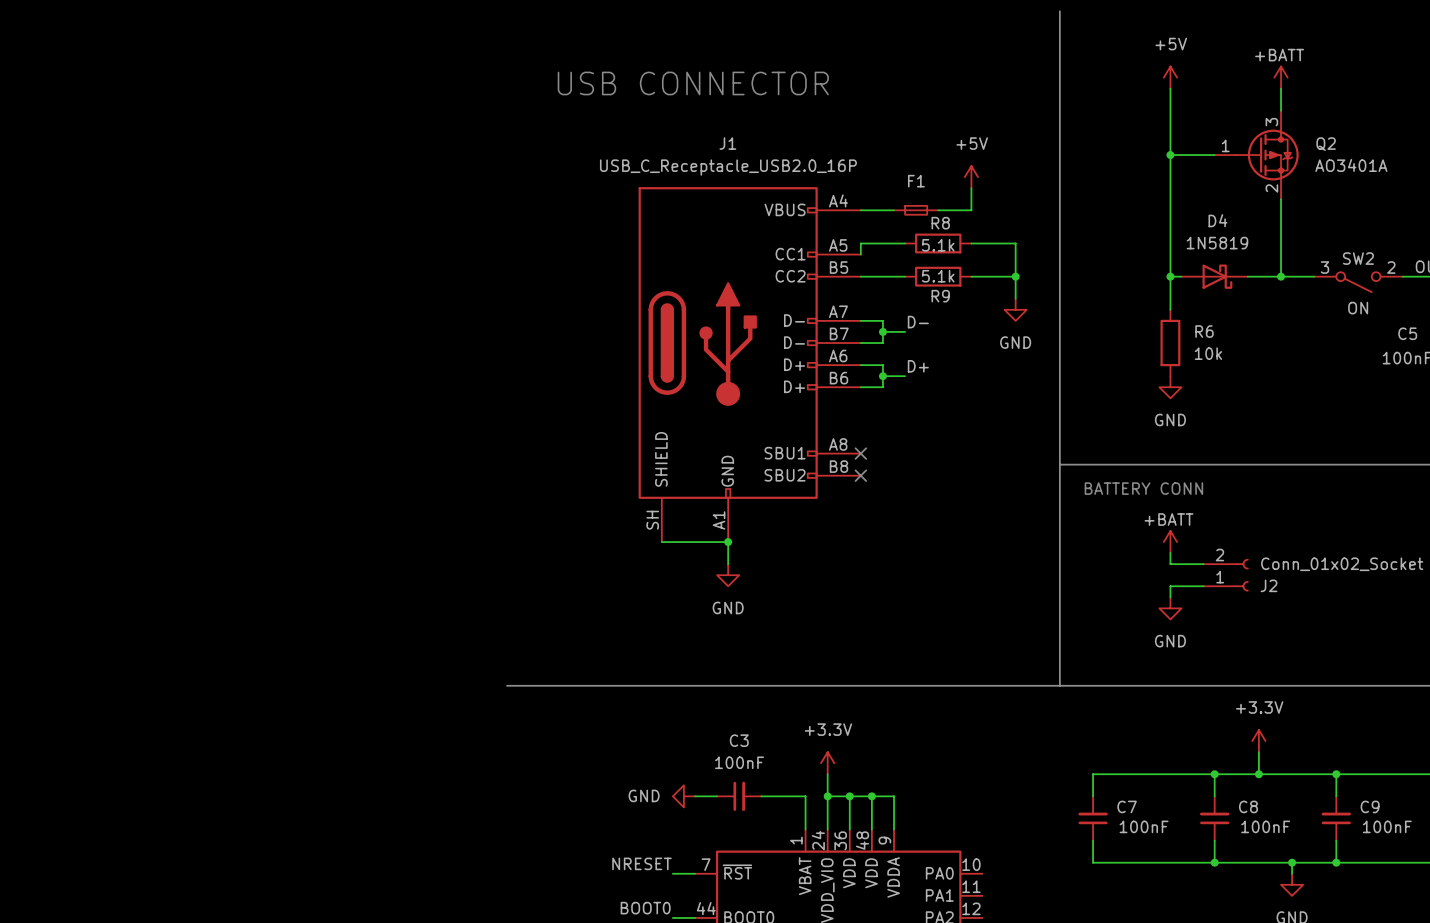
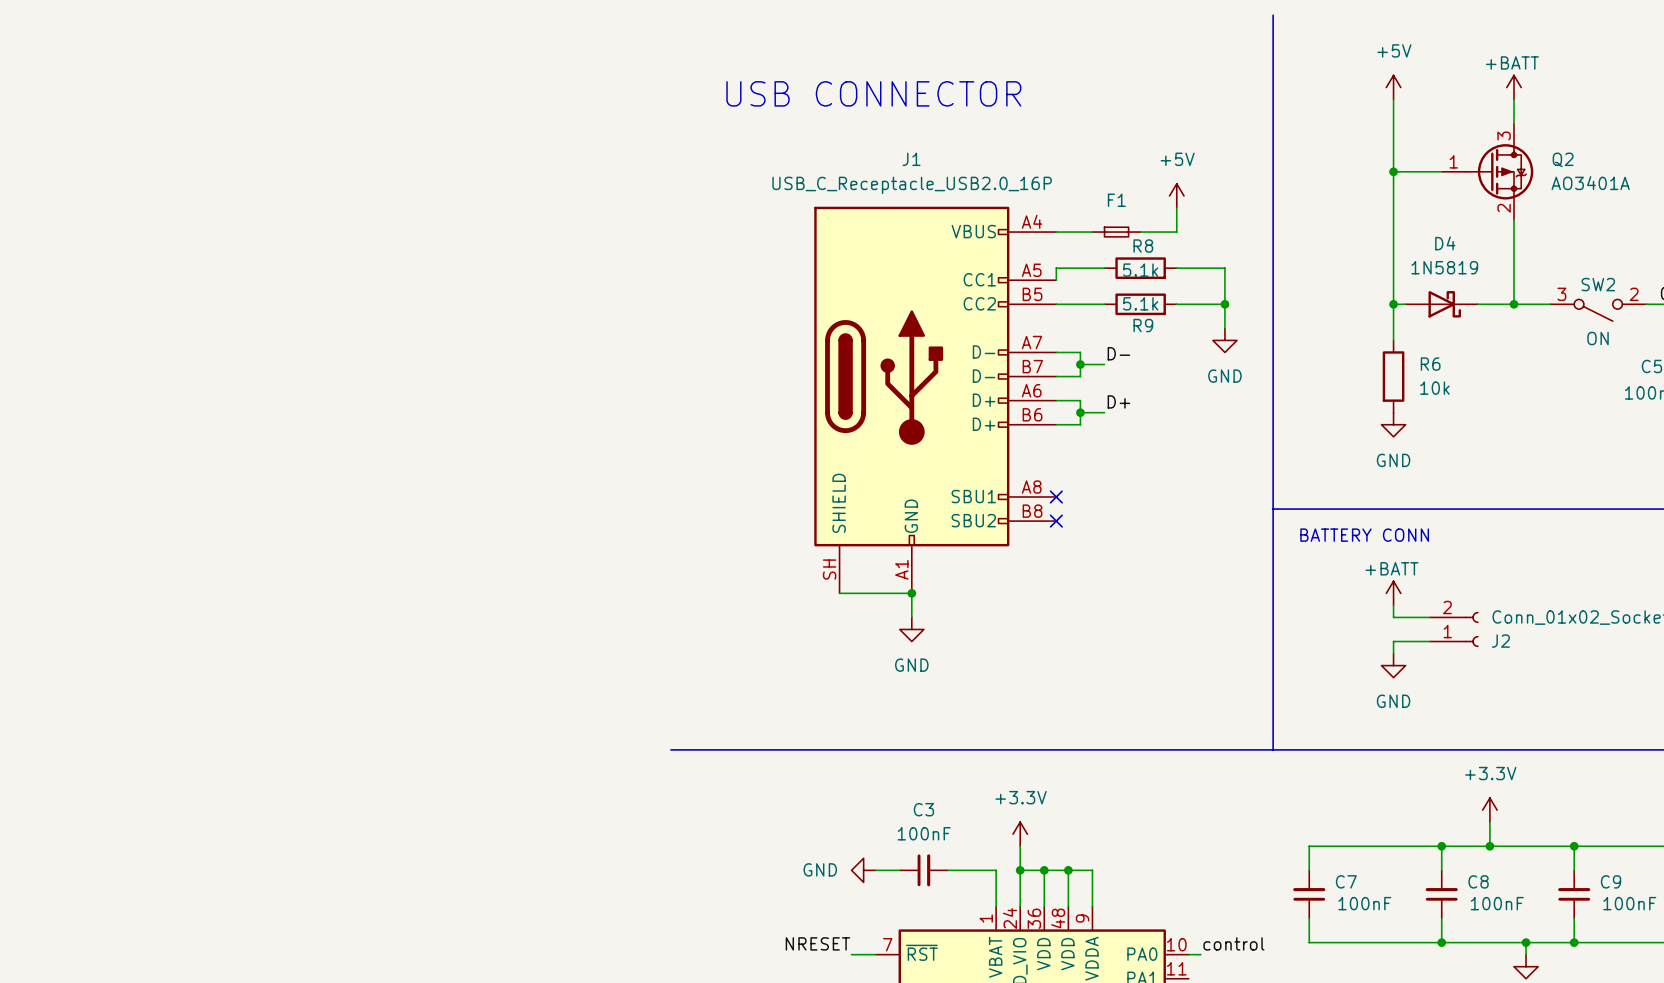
label: none -> control (1233, 943)
wire: none -> (1188, 954) (1200, 954)

